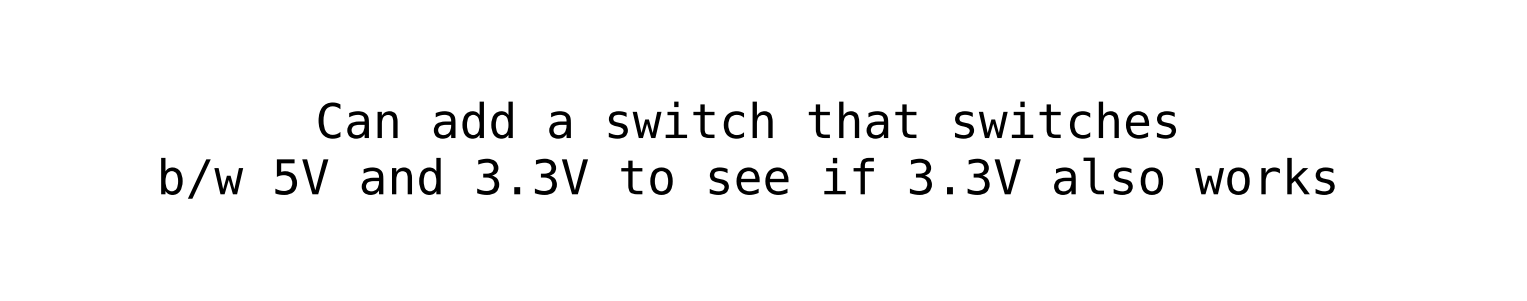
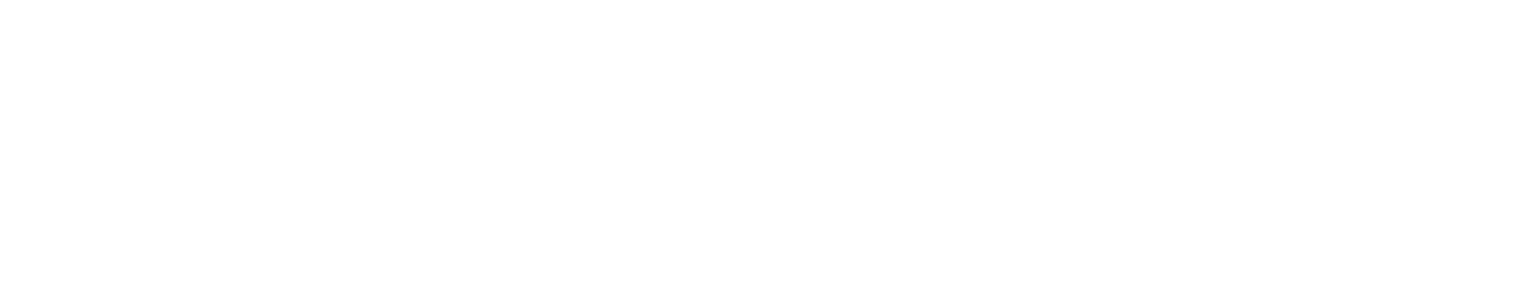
text: Can add a switch that switches (747, 120) -> none
text: b/w 5V and 3.3V to see if 3.3V also works (747, 178) -> none

